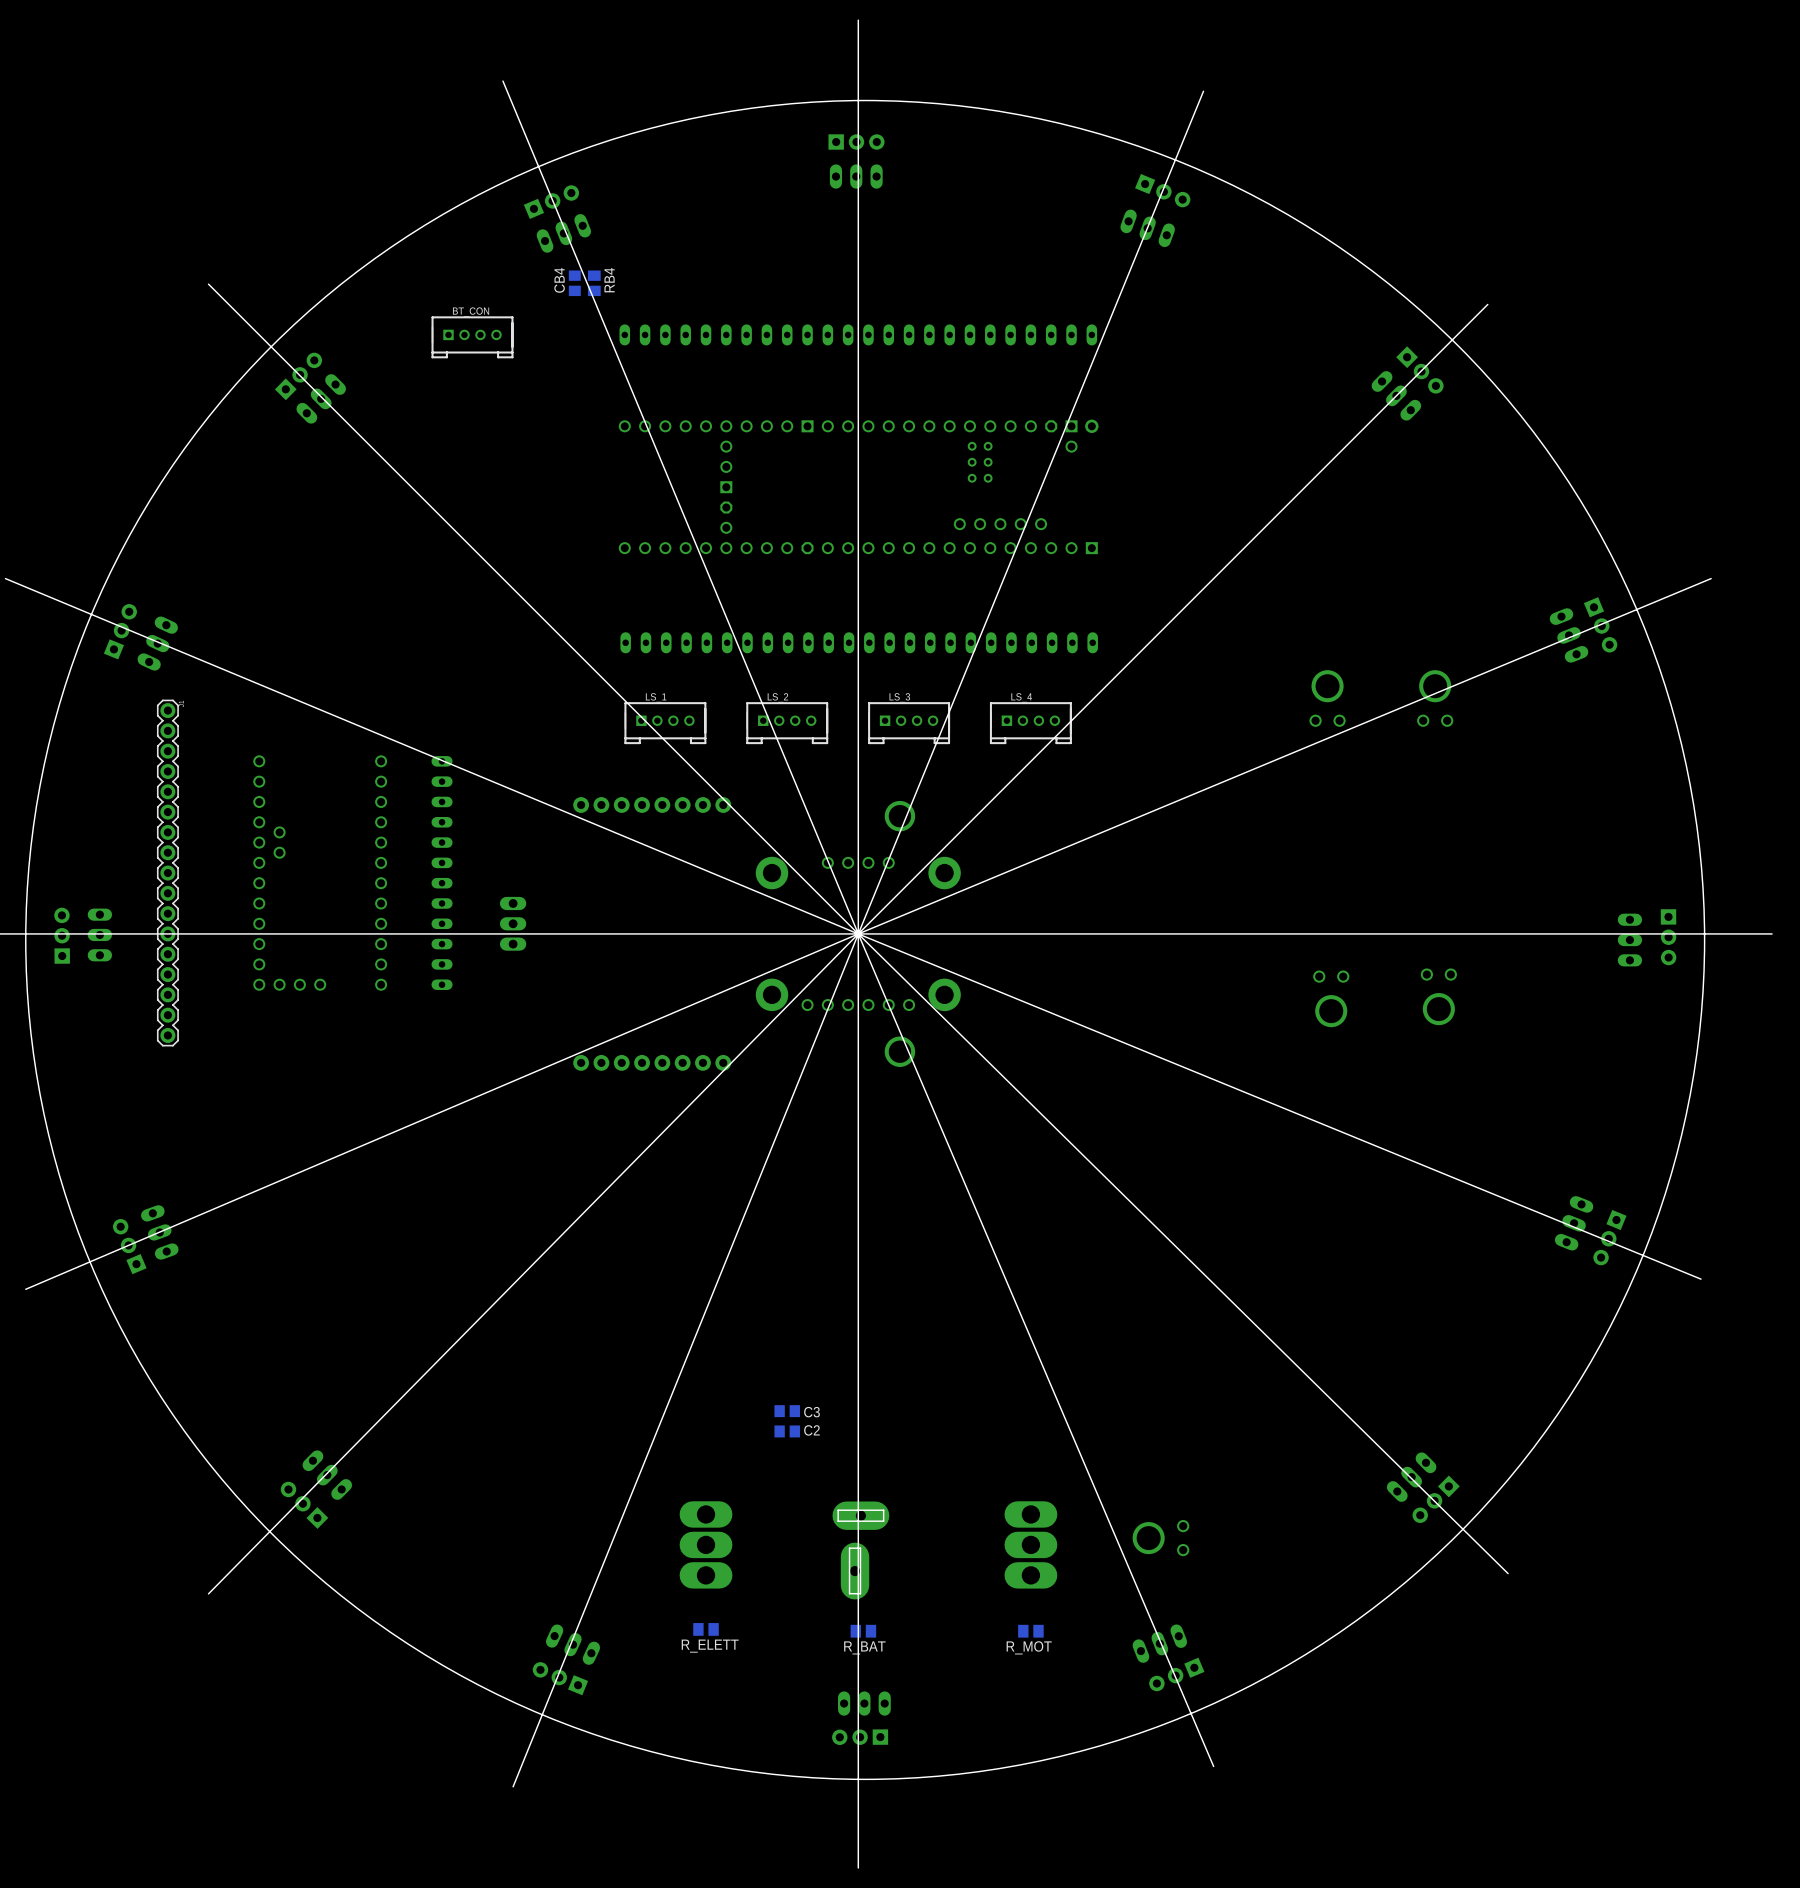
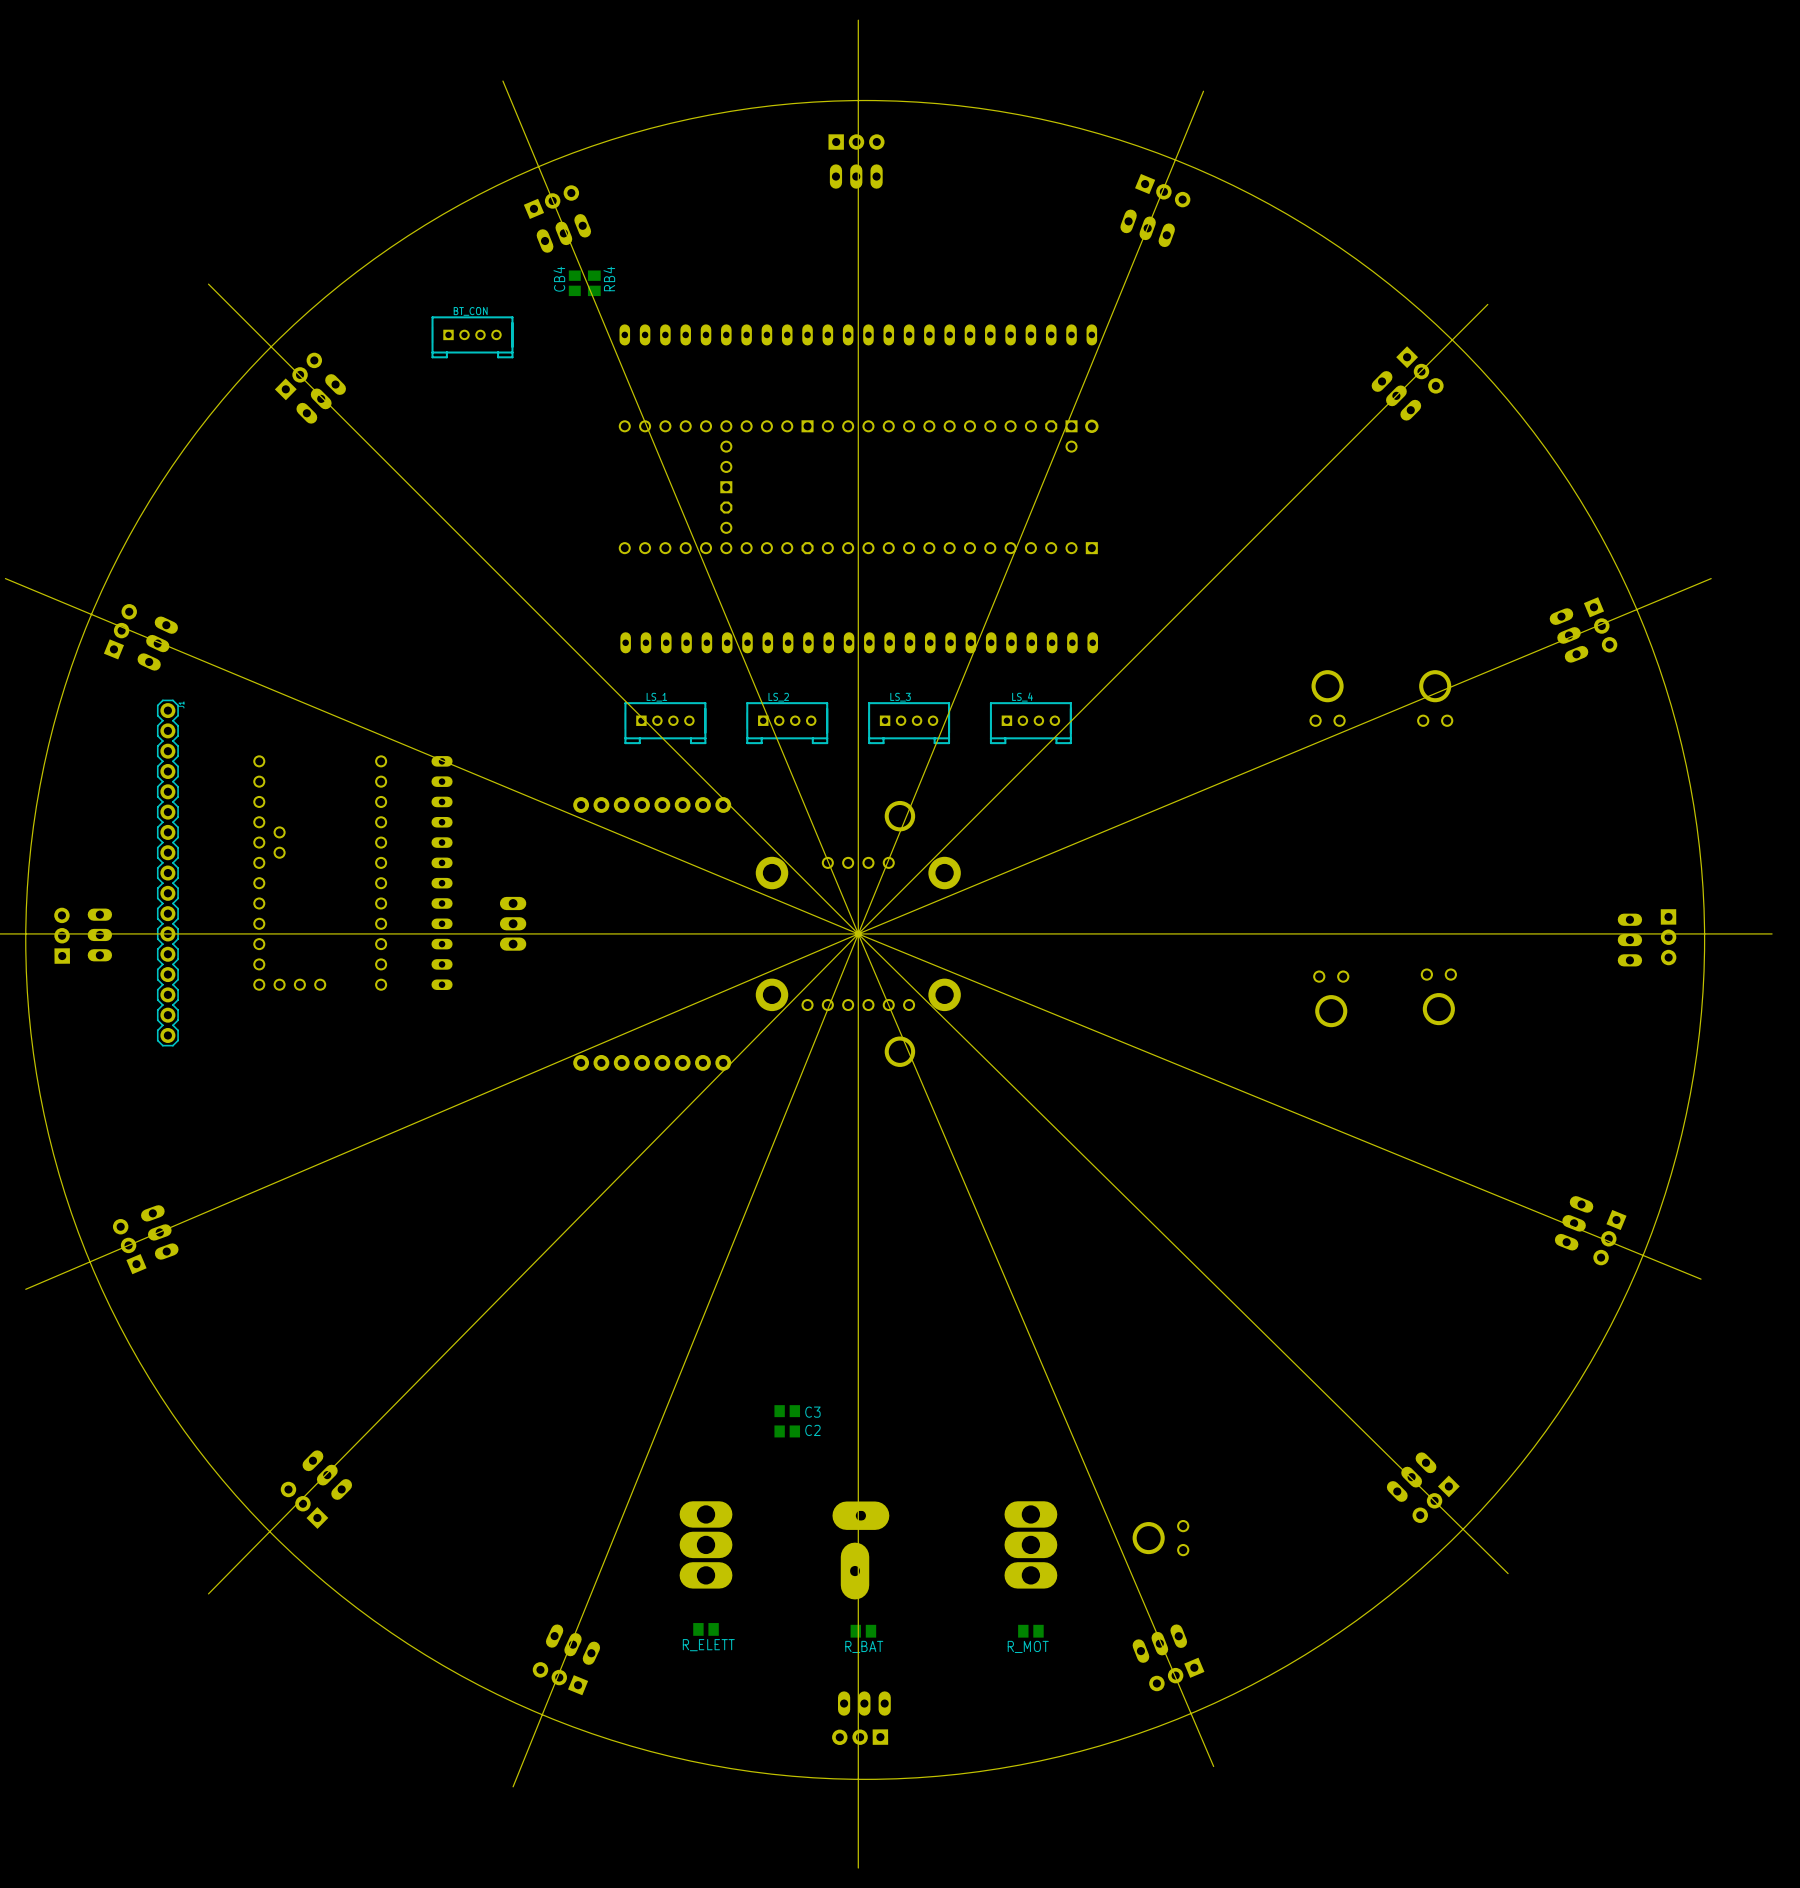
part footprint: [618, 419, 1099, 555] -> [618, 419, 1099, 555]

